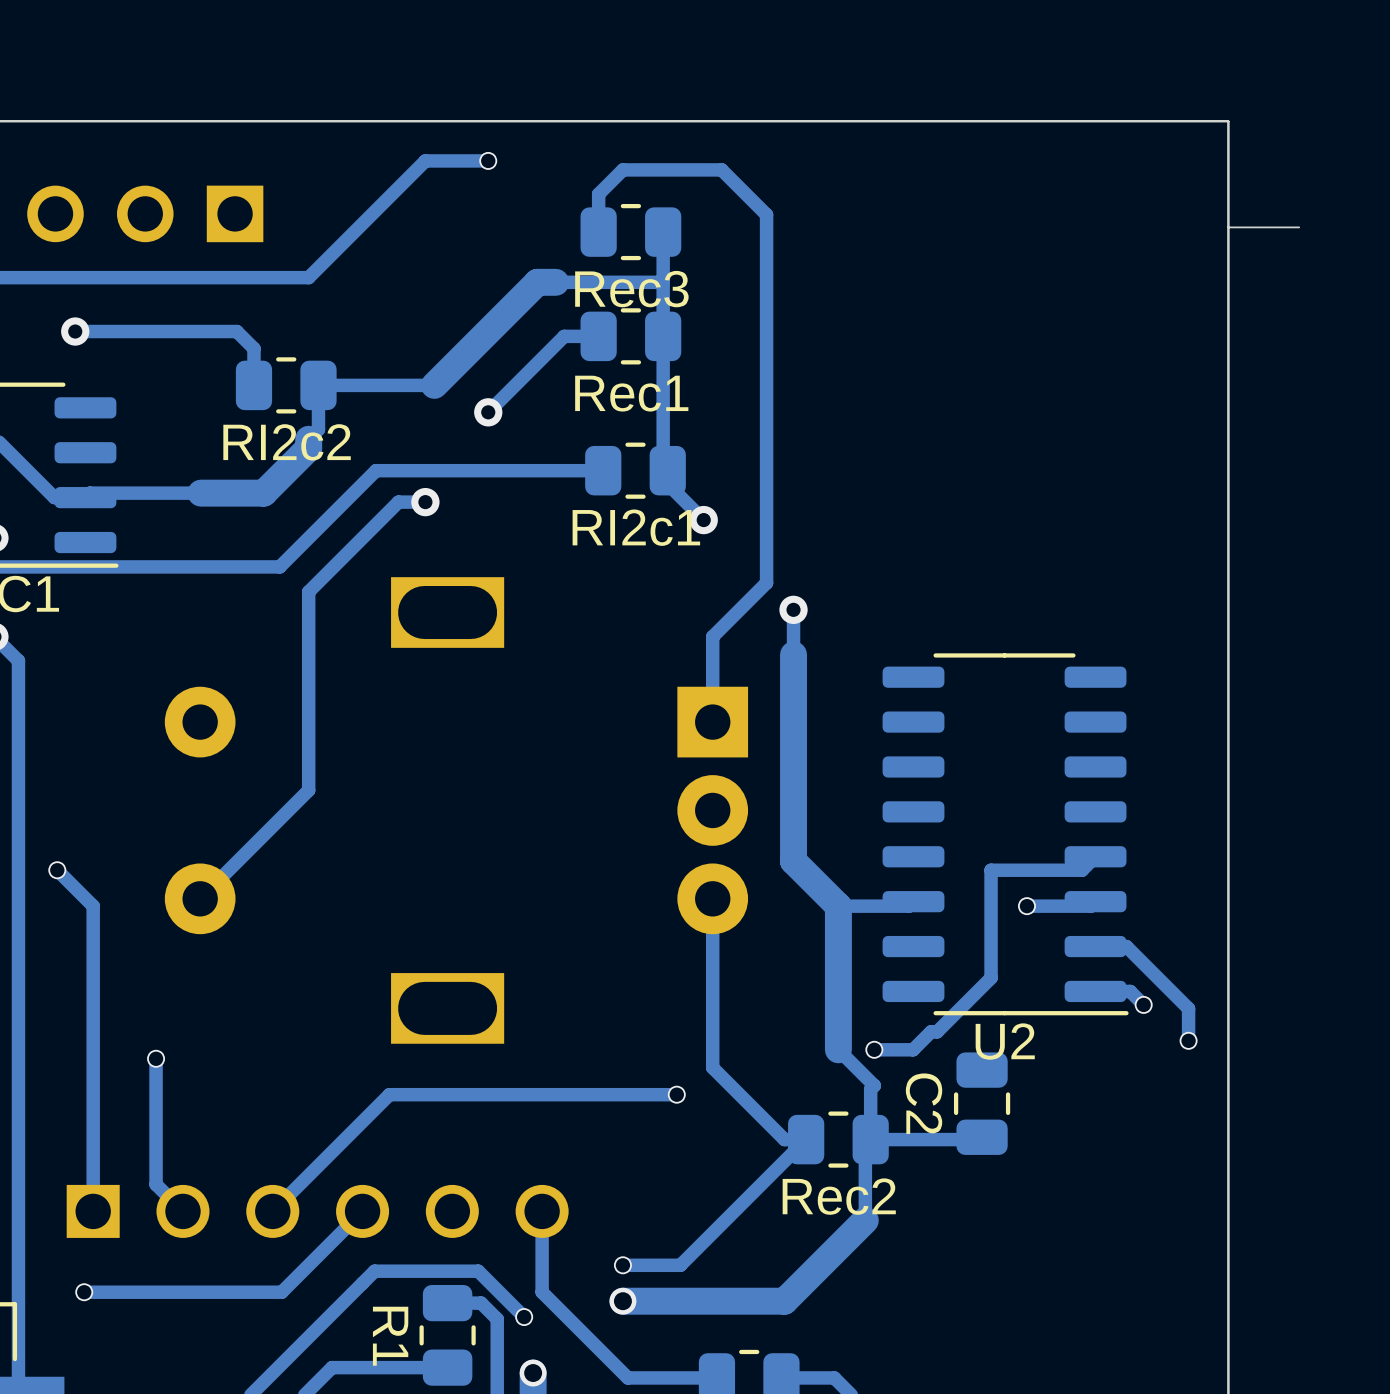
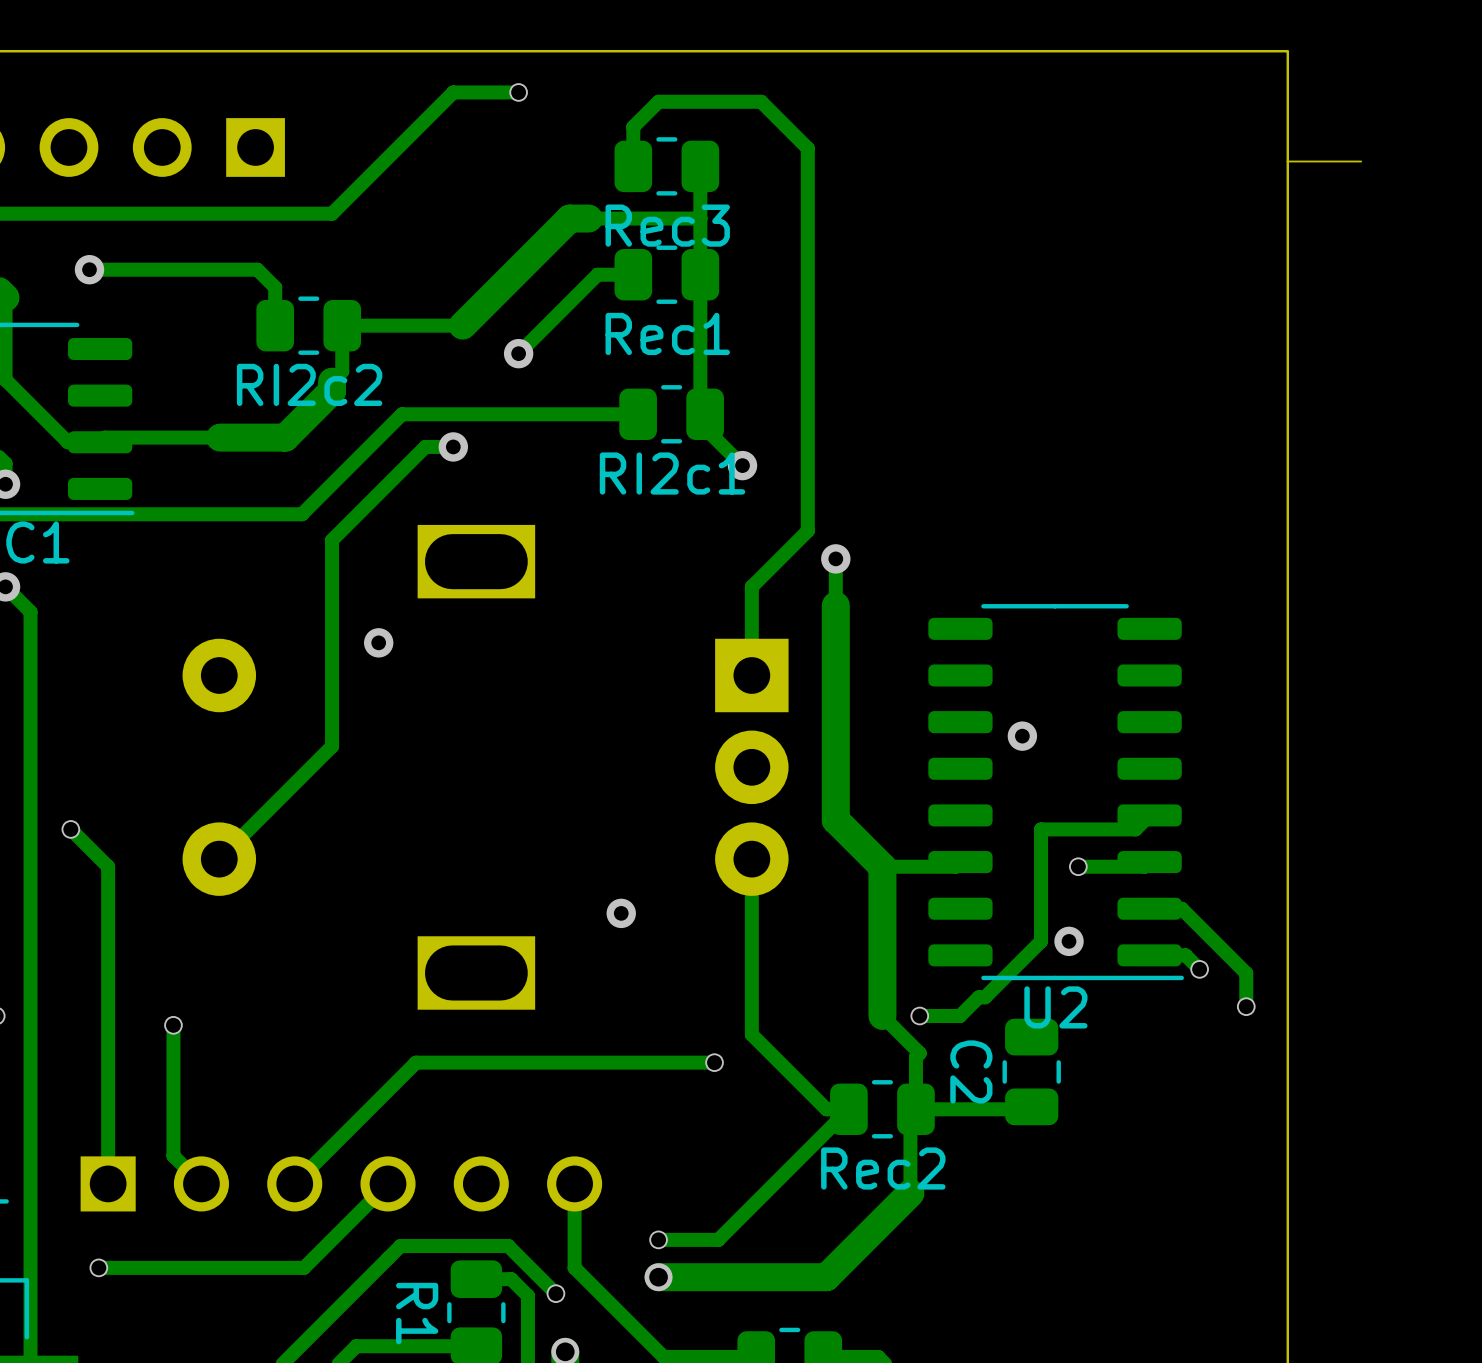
via: none -> (378, 642)
via: none -> (1022, 736)
via: none -> (621, 913)
via: none -> (1069, 941)

